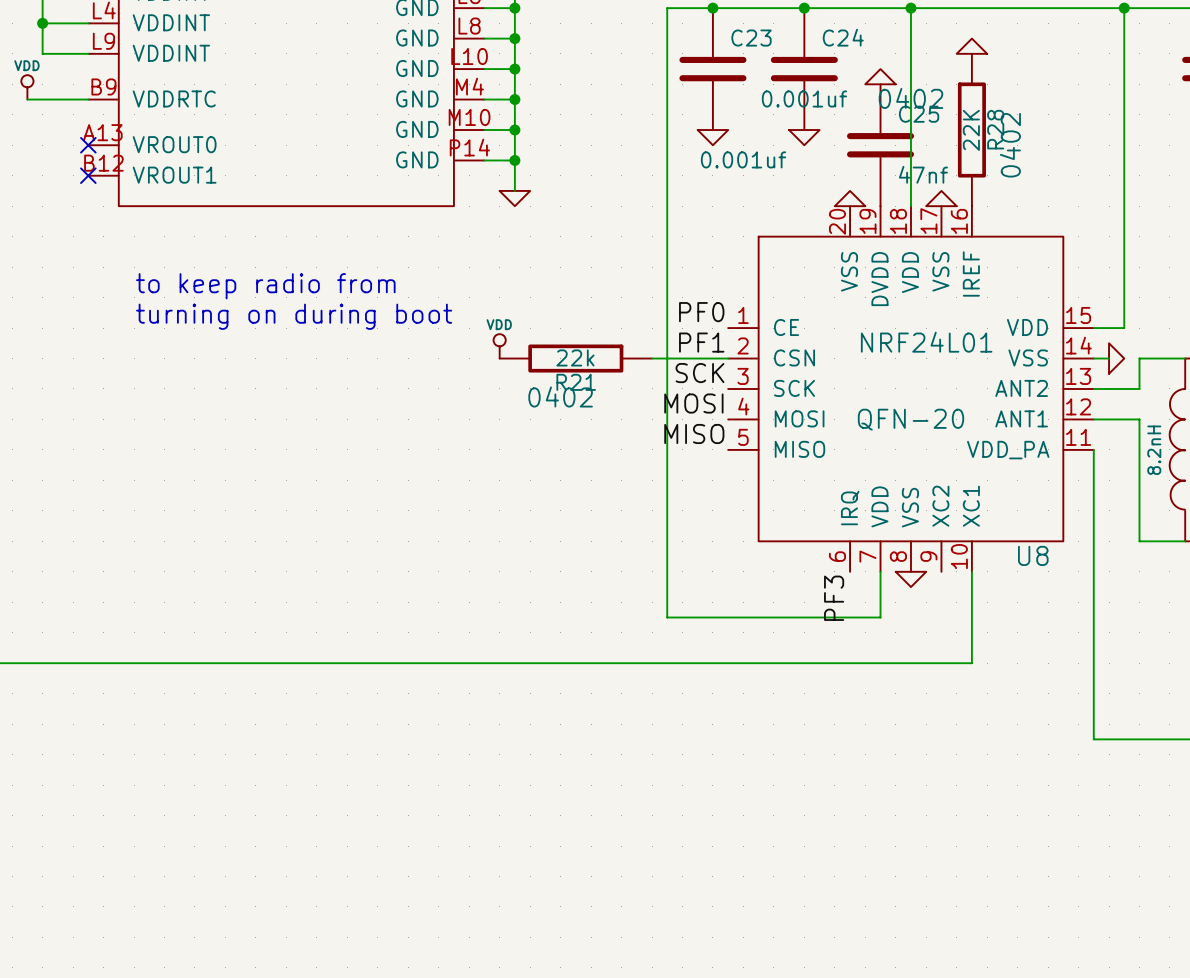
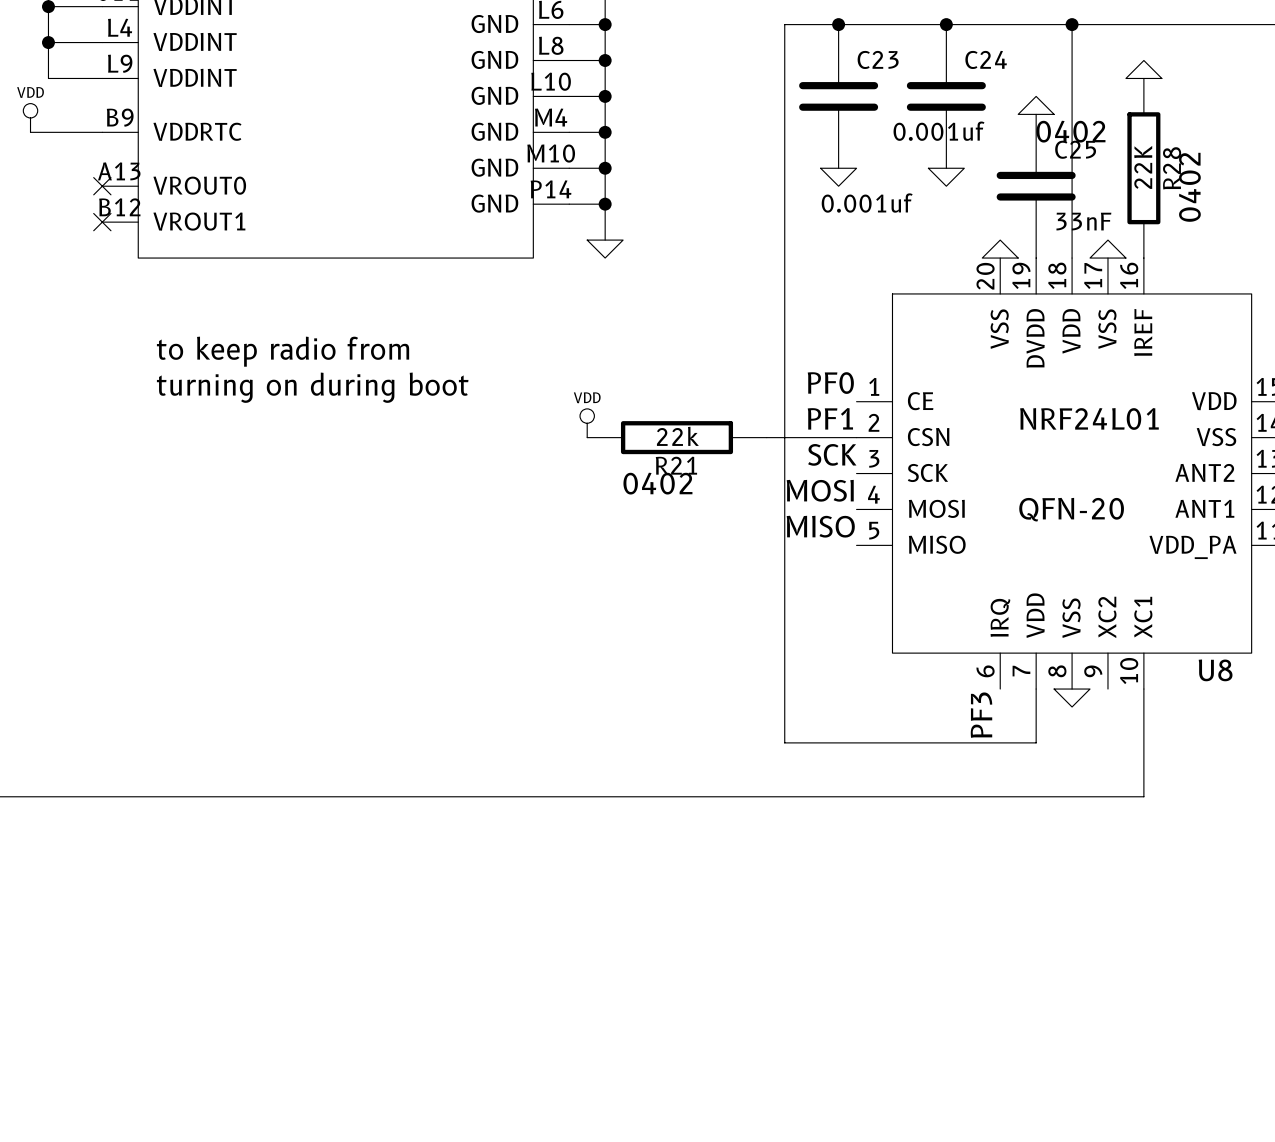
C25 value: 47nf (923, 174) -> 33nF (1083, 221)

